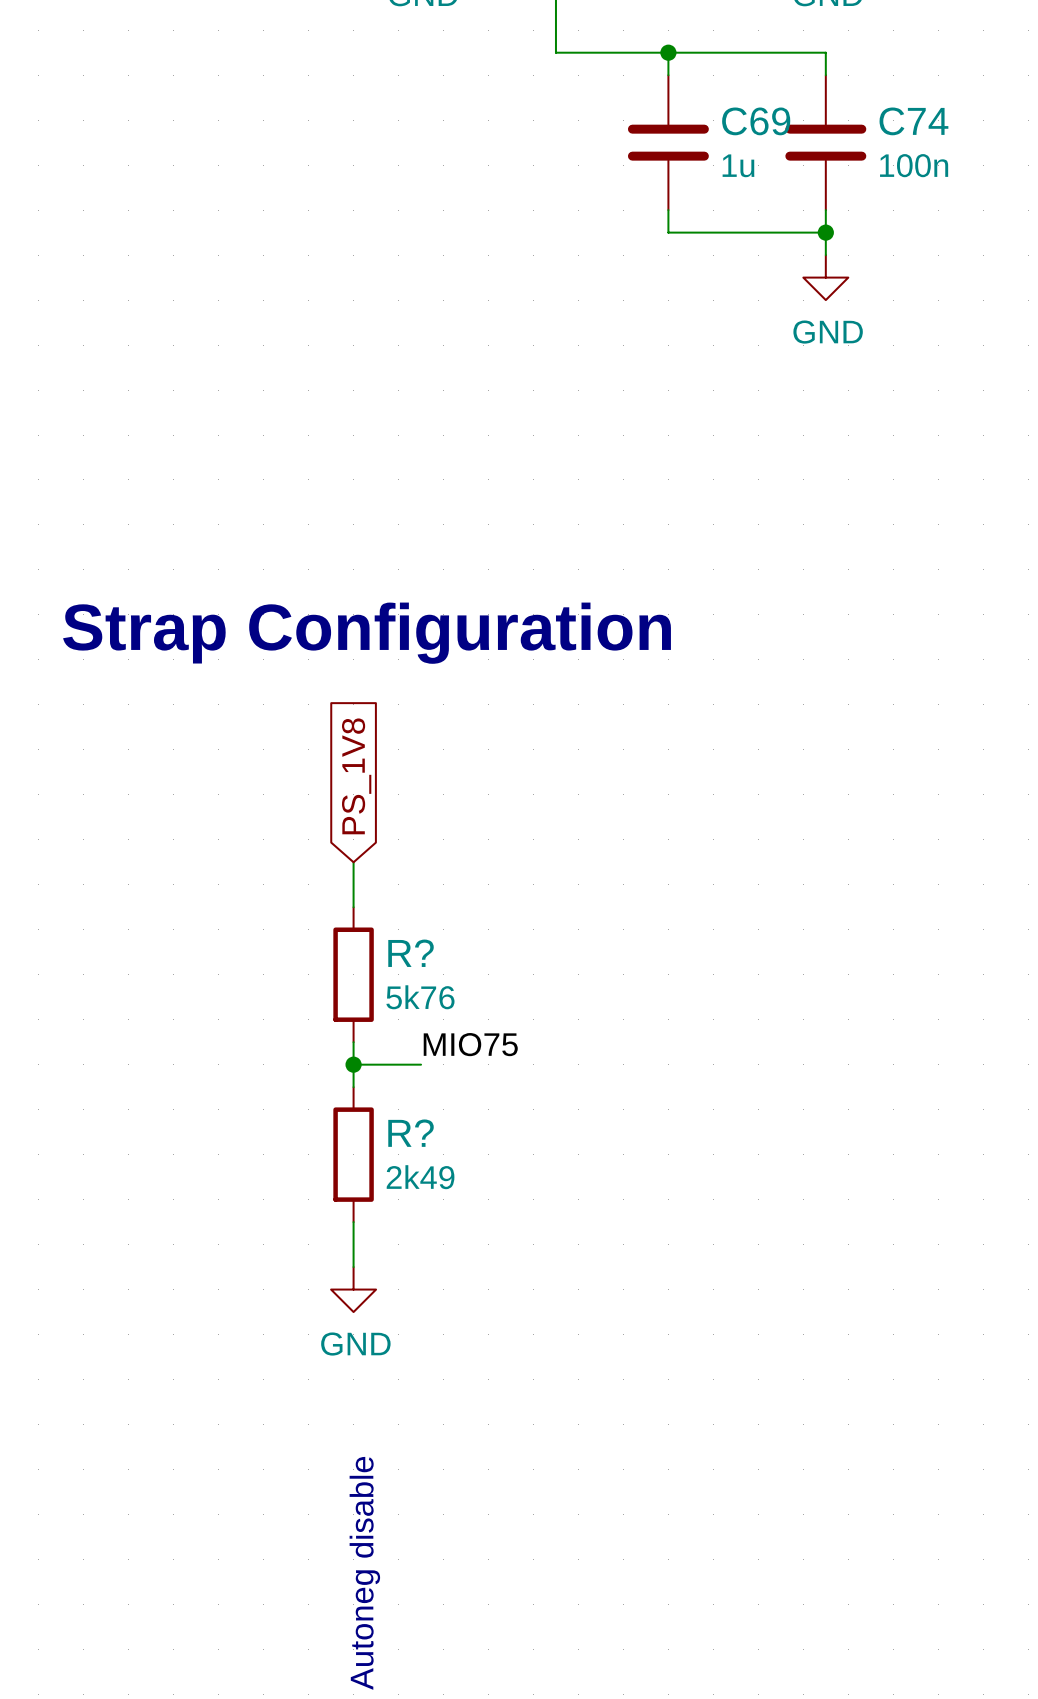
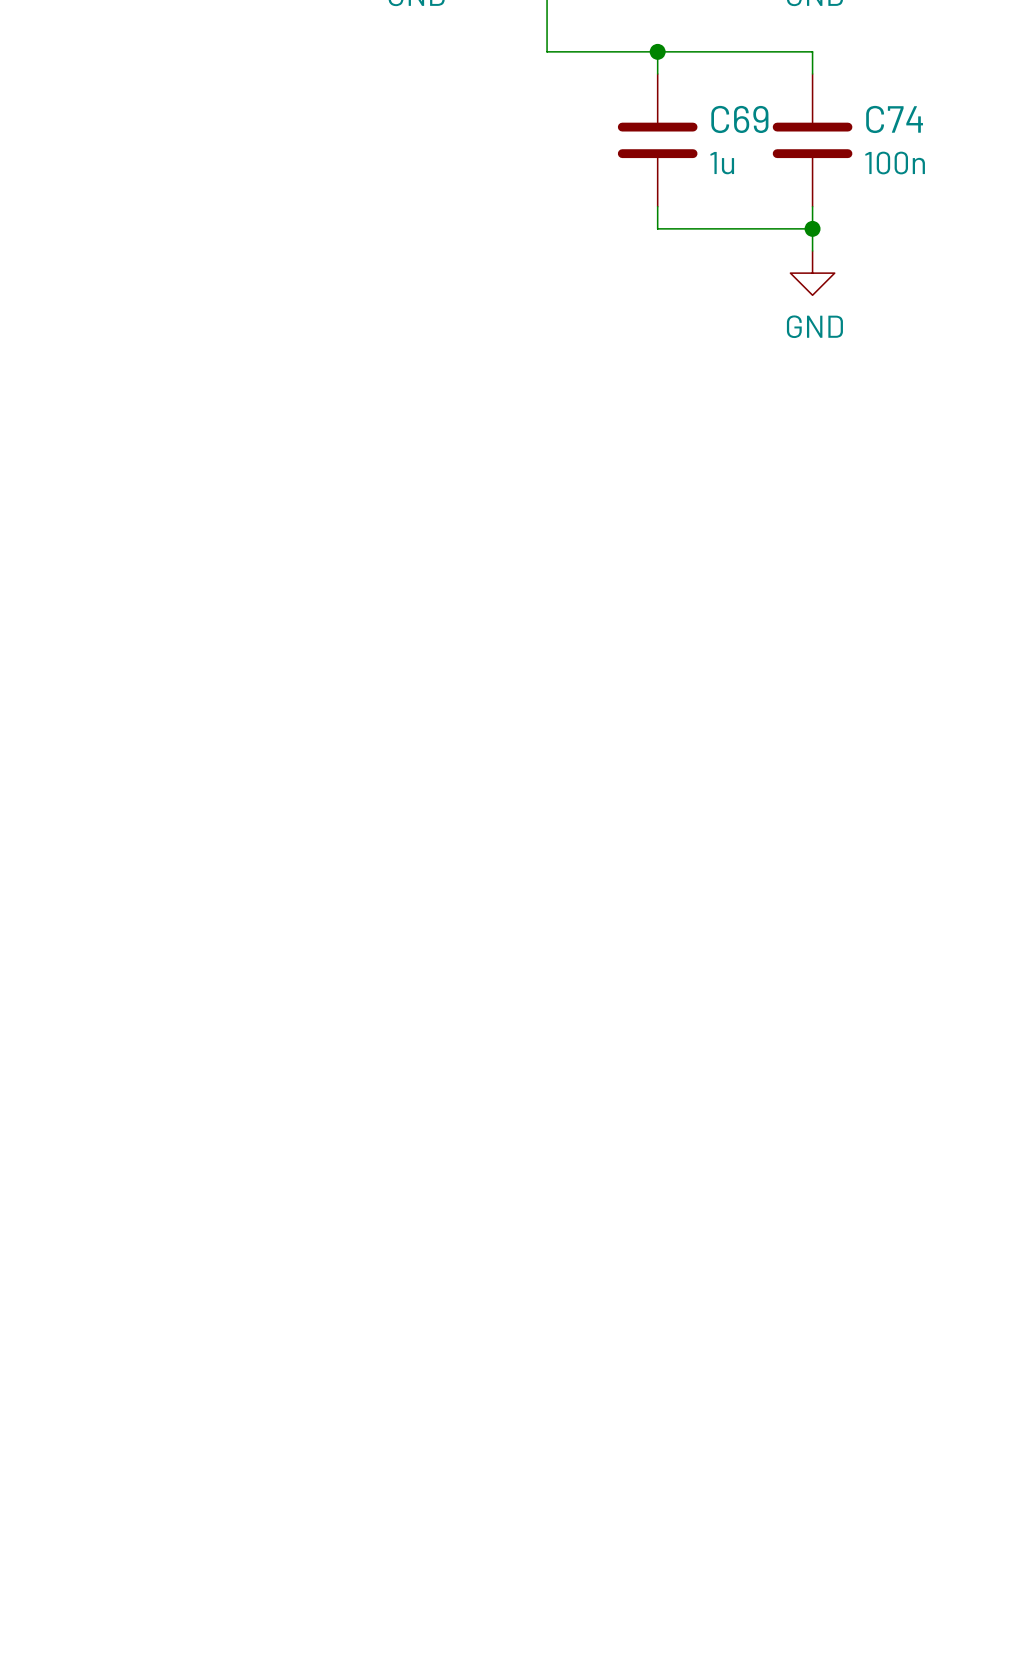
text: Strap Configuration (367, 633) -> none
global label: PS_1V8 (356, 776) -> none
wire: (353, 862) (353, 907) -> none
R?: (353, 974) -> none
wire: (353, 1042) (353, 1087) -> none
label: MIO75 (470, 1044) -> none
wire: (353, 1064) (421, 1064) -> none
junction: (353, 1064) -> none
R?: (353, 1154) -> none
wire: (353, 1222) (353, 1267) -> none
power symbol: GND (353, 1289) -> none
text: Autoneg disable (364, 1573) -> none

